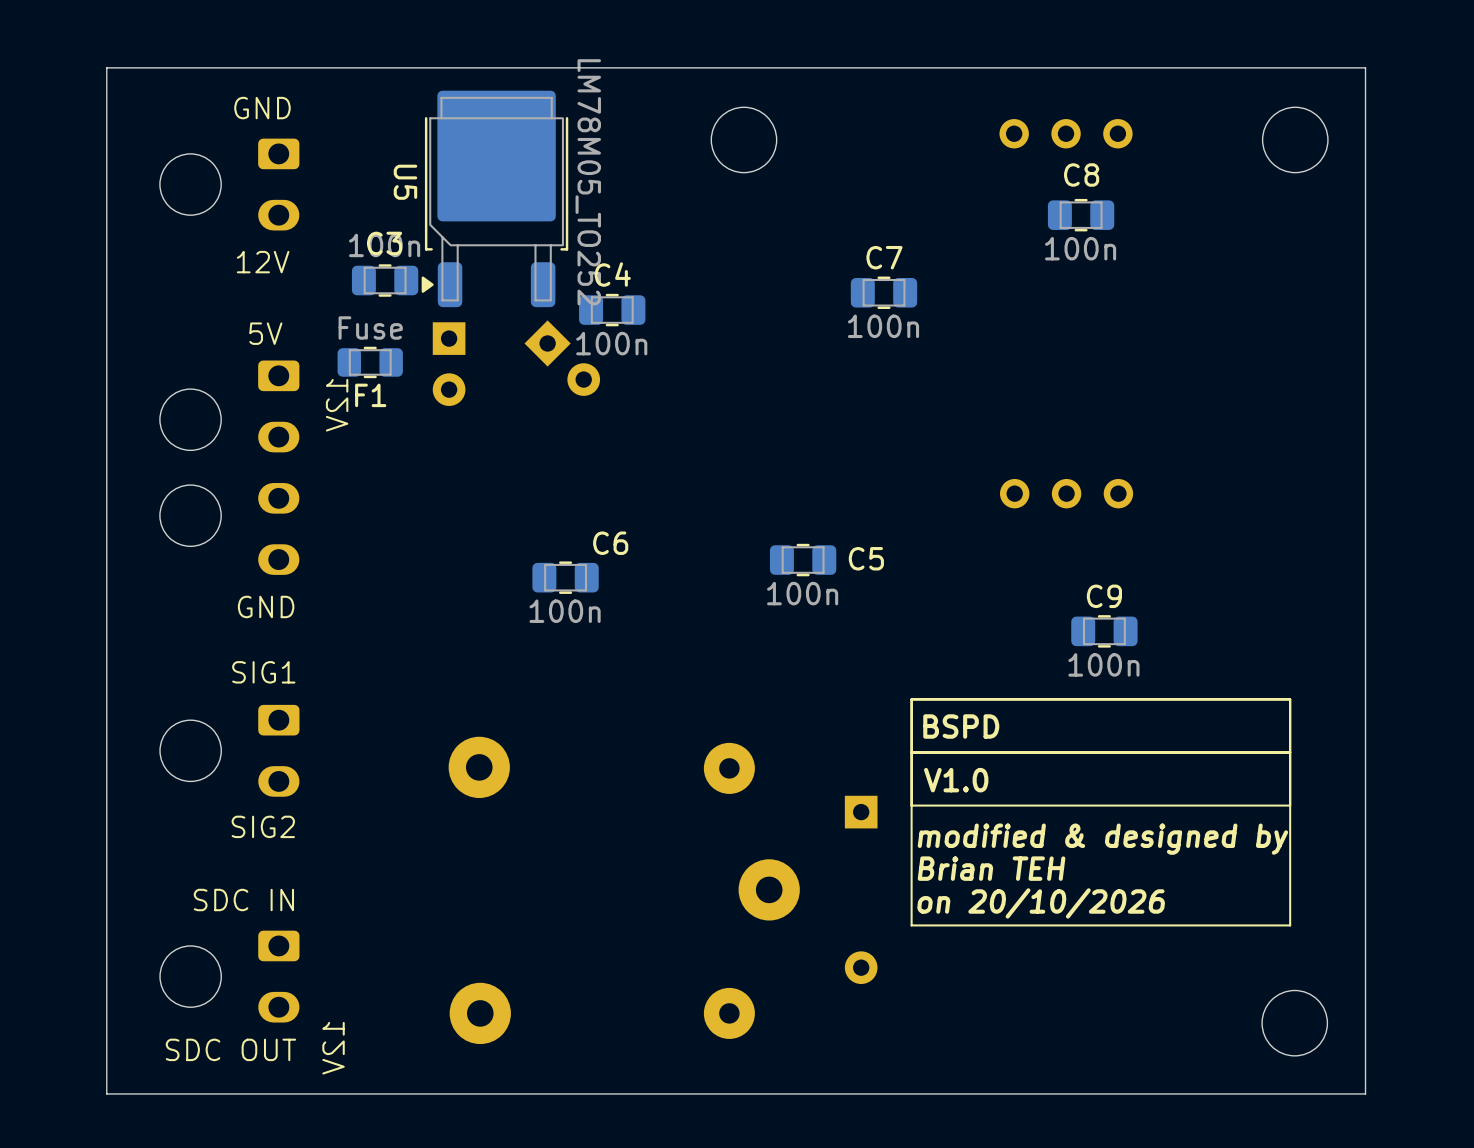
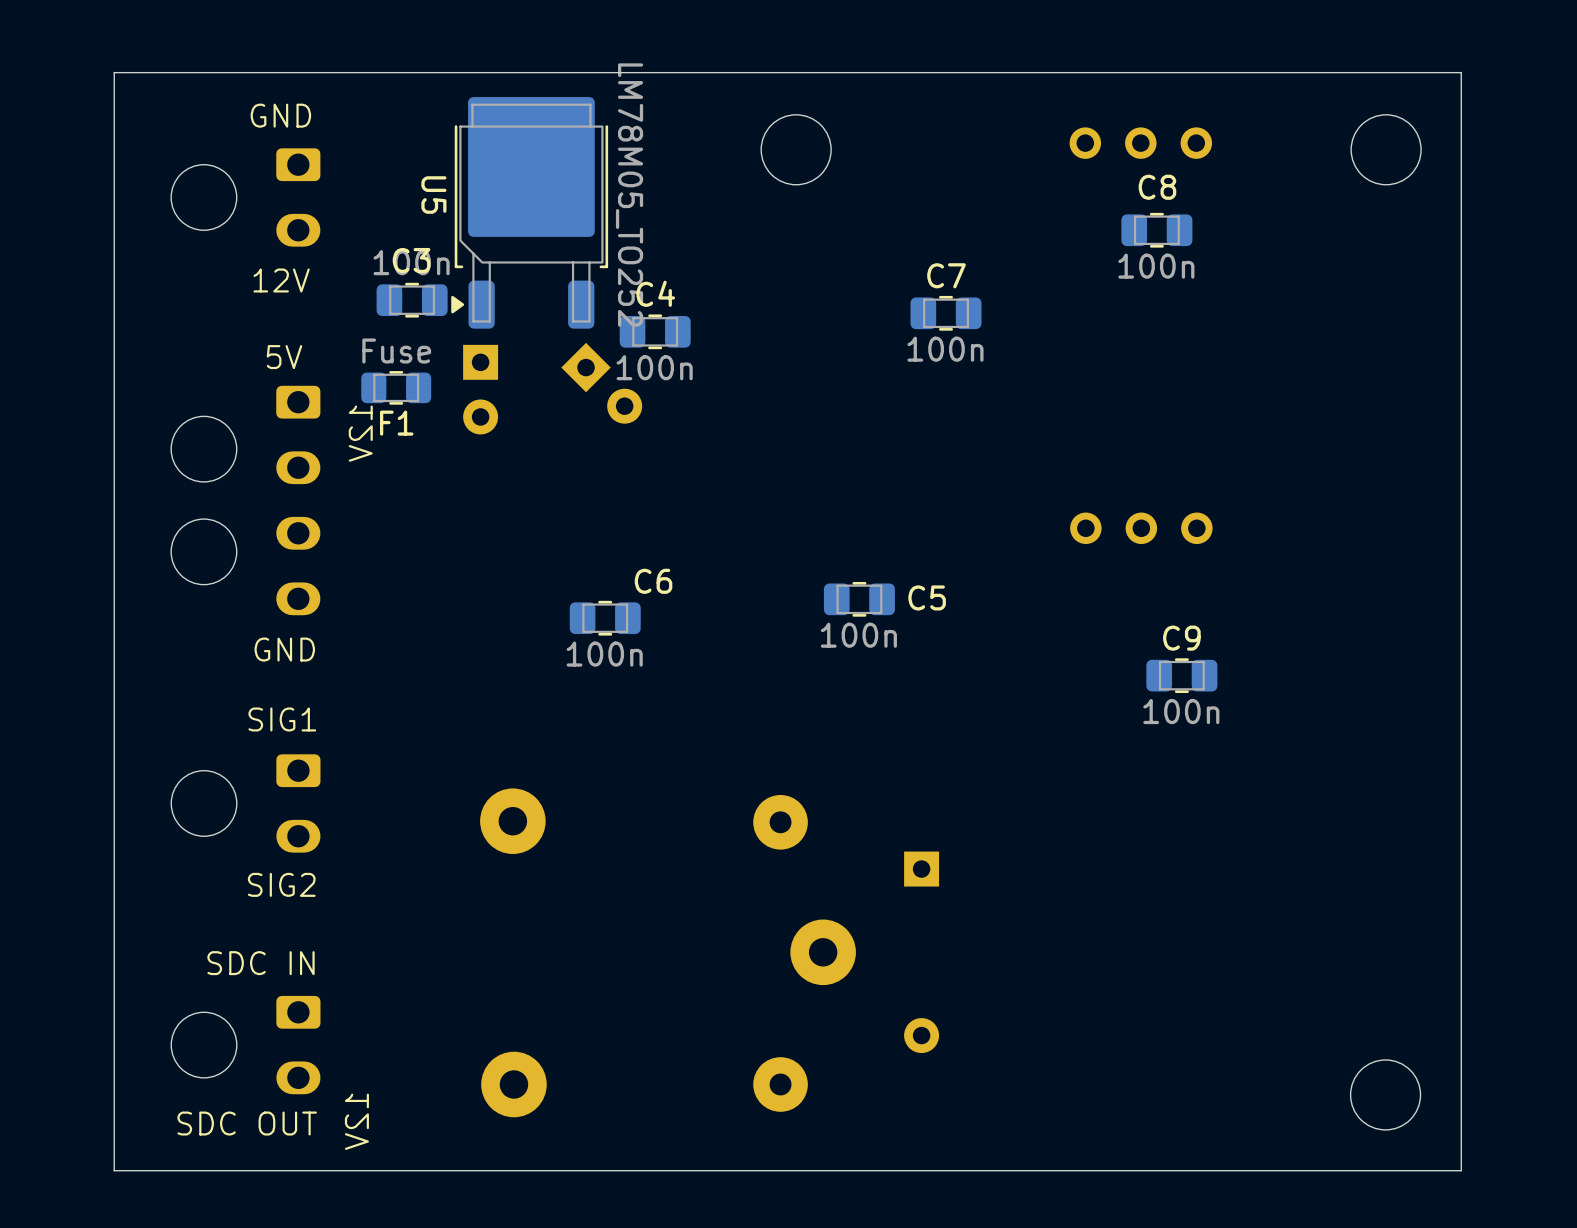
line: (1290, 699) (1290, 925) (911, 925) (911, 699) (1290, 699) -> none
text: BSPD (961, 726) -> none
line: (1290, 752) (911, 752) -> none
text: V1.0 (956, 780) -> none
line: (1290, 805) (911, 805) -> none
text: modified & designed by (1102, 839) -> none
text: Brian TEH (991, 868) -> none
text: on 20/10/2026 (1041, 903) -> none

